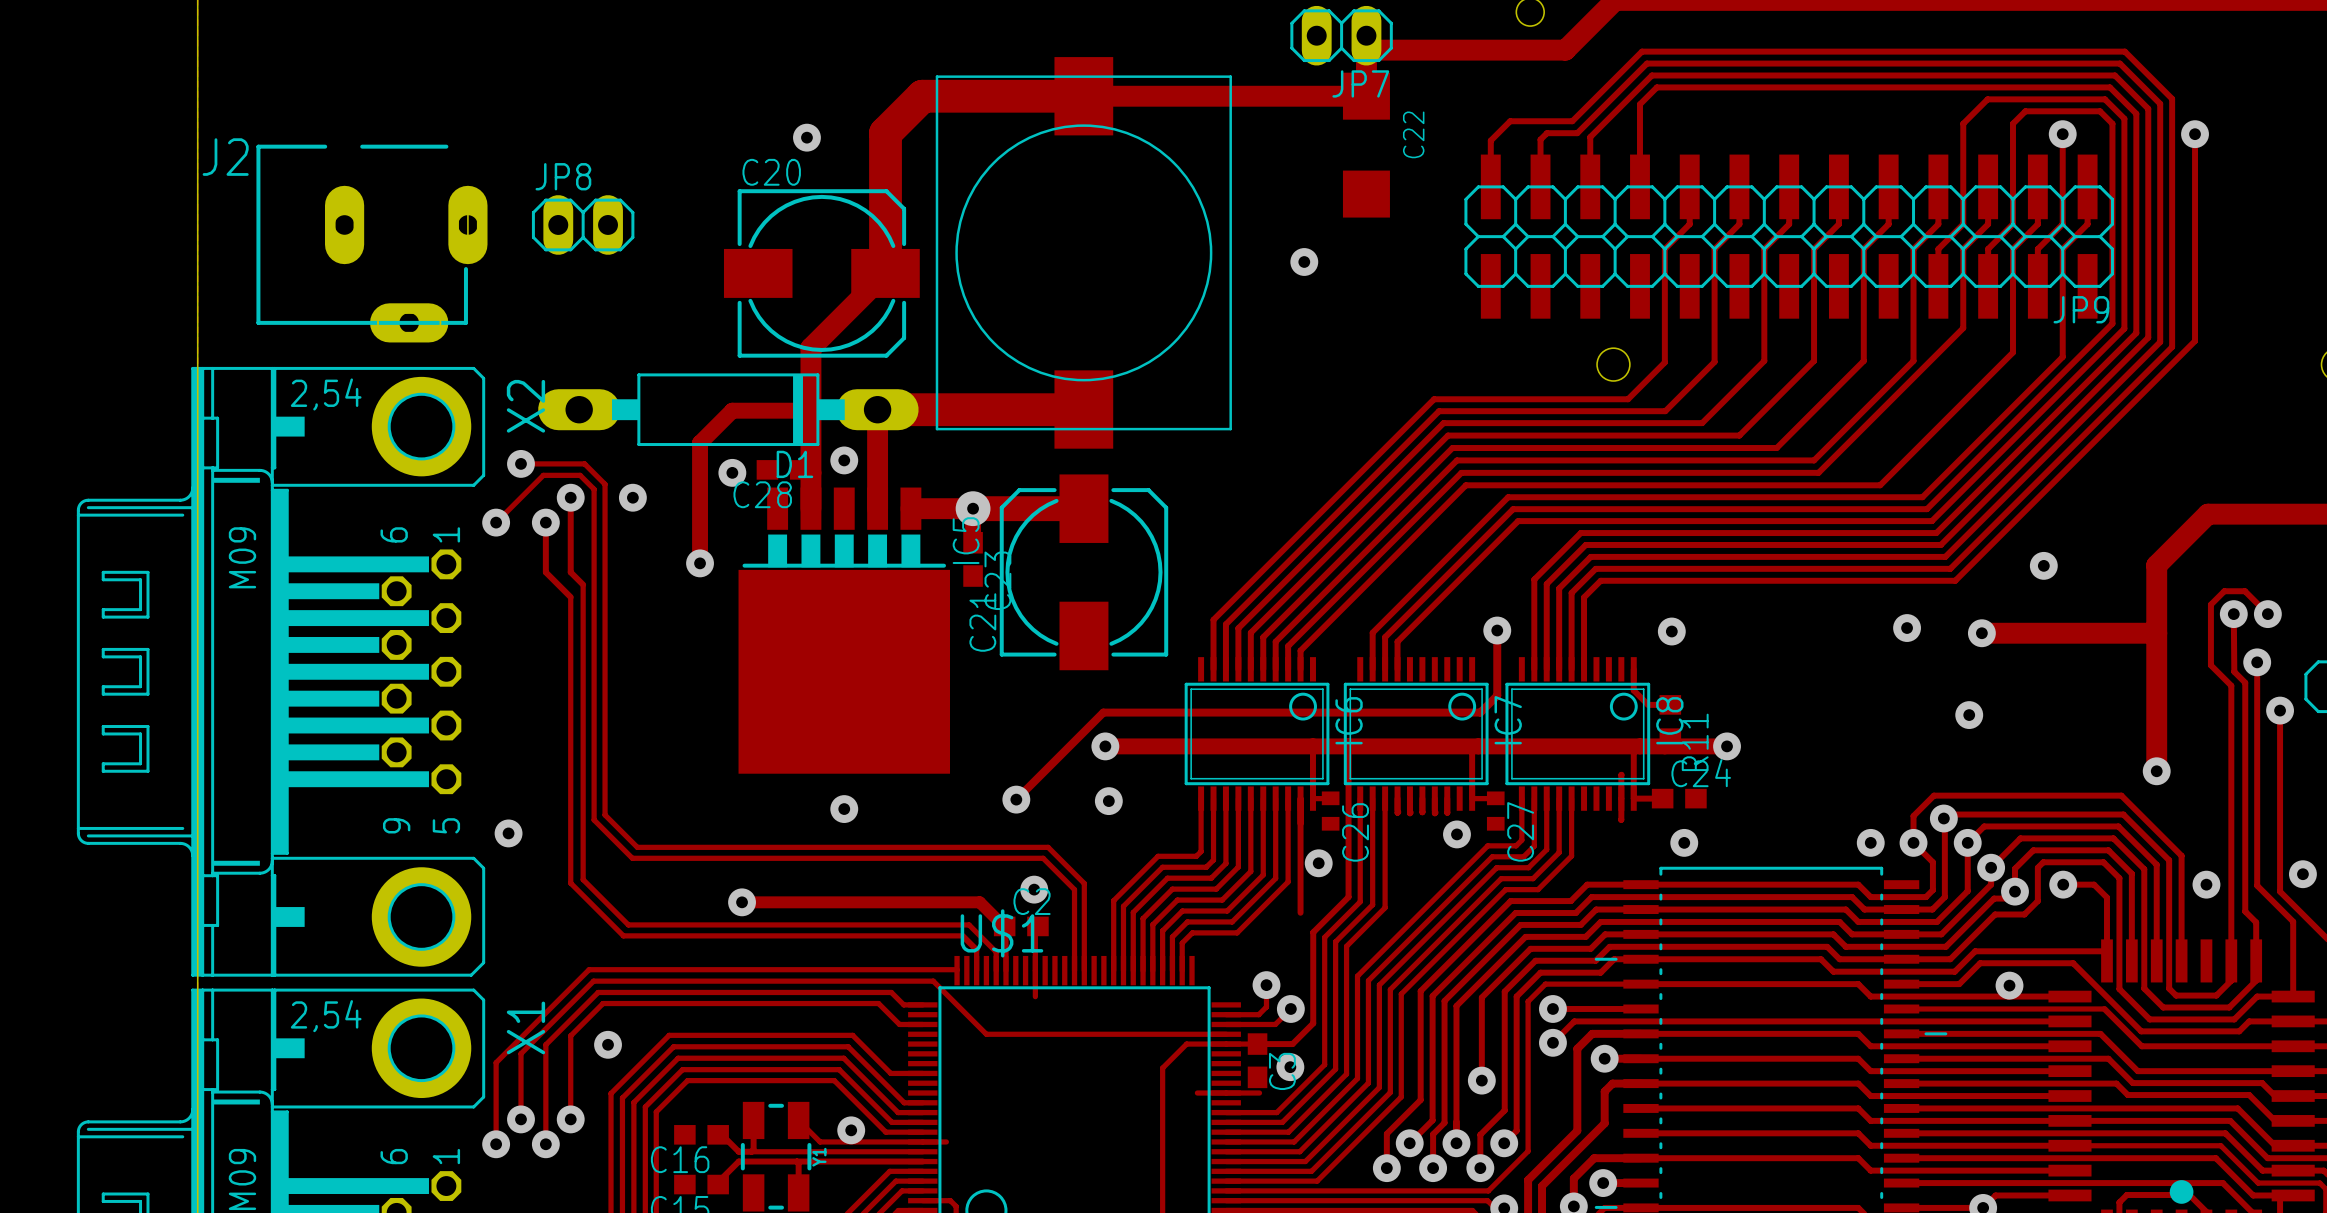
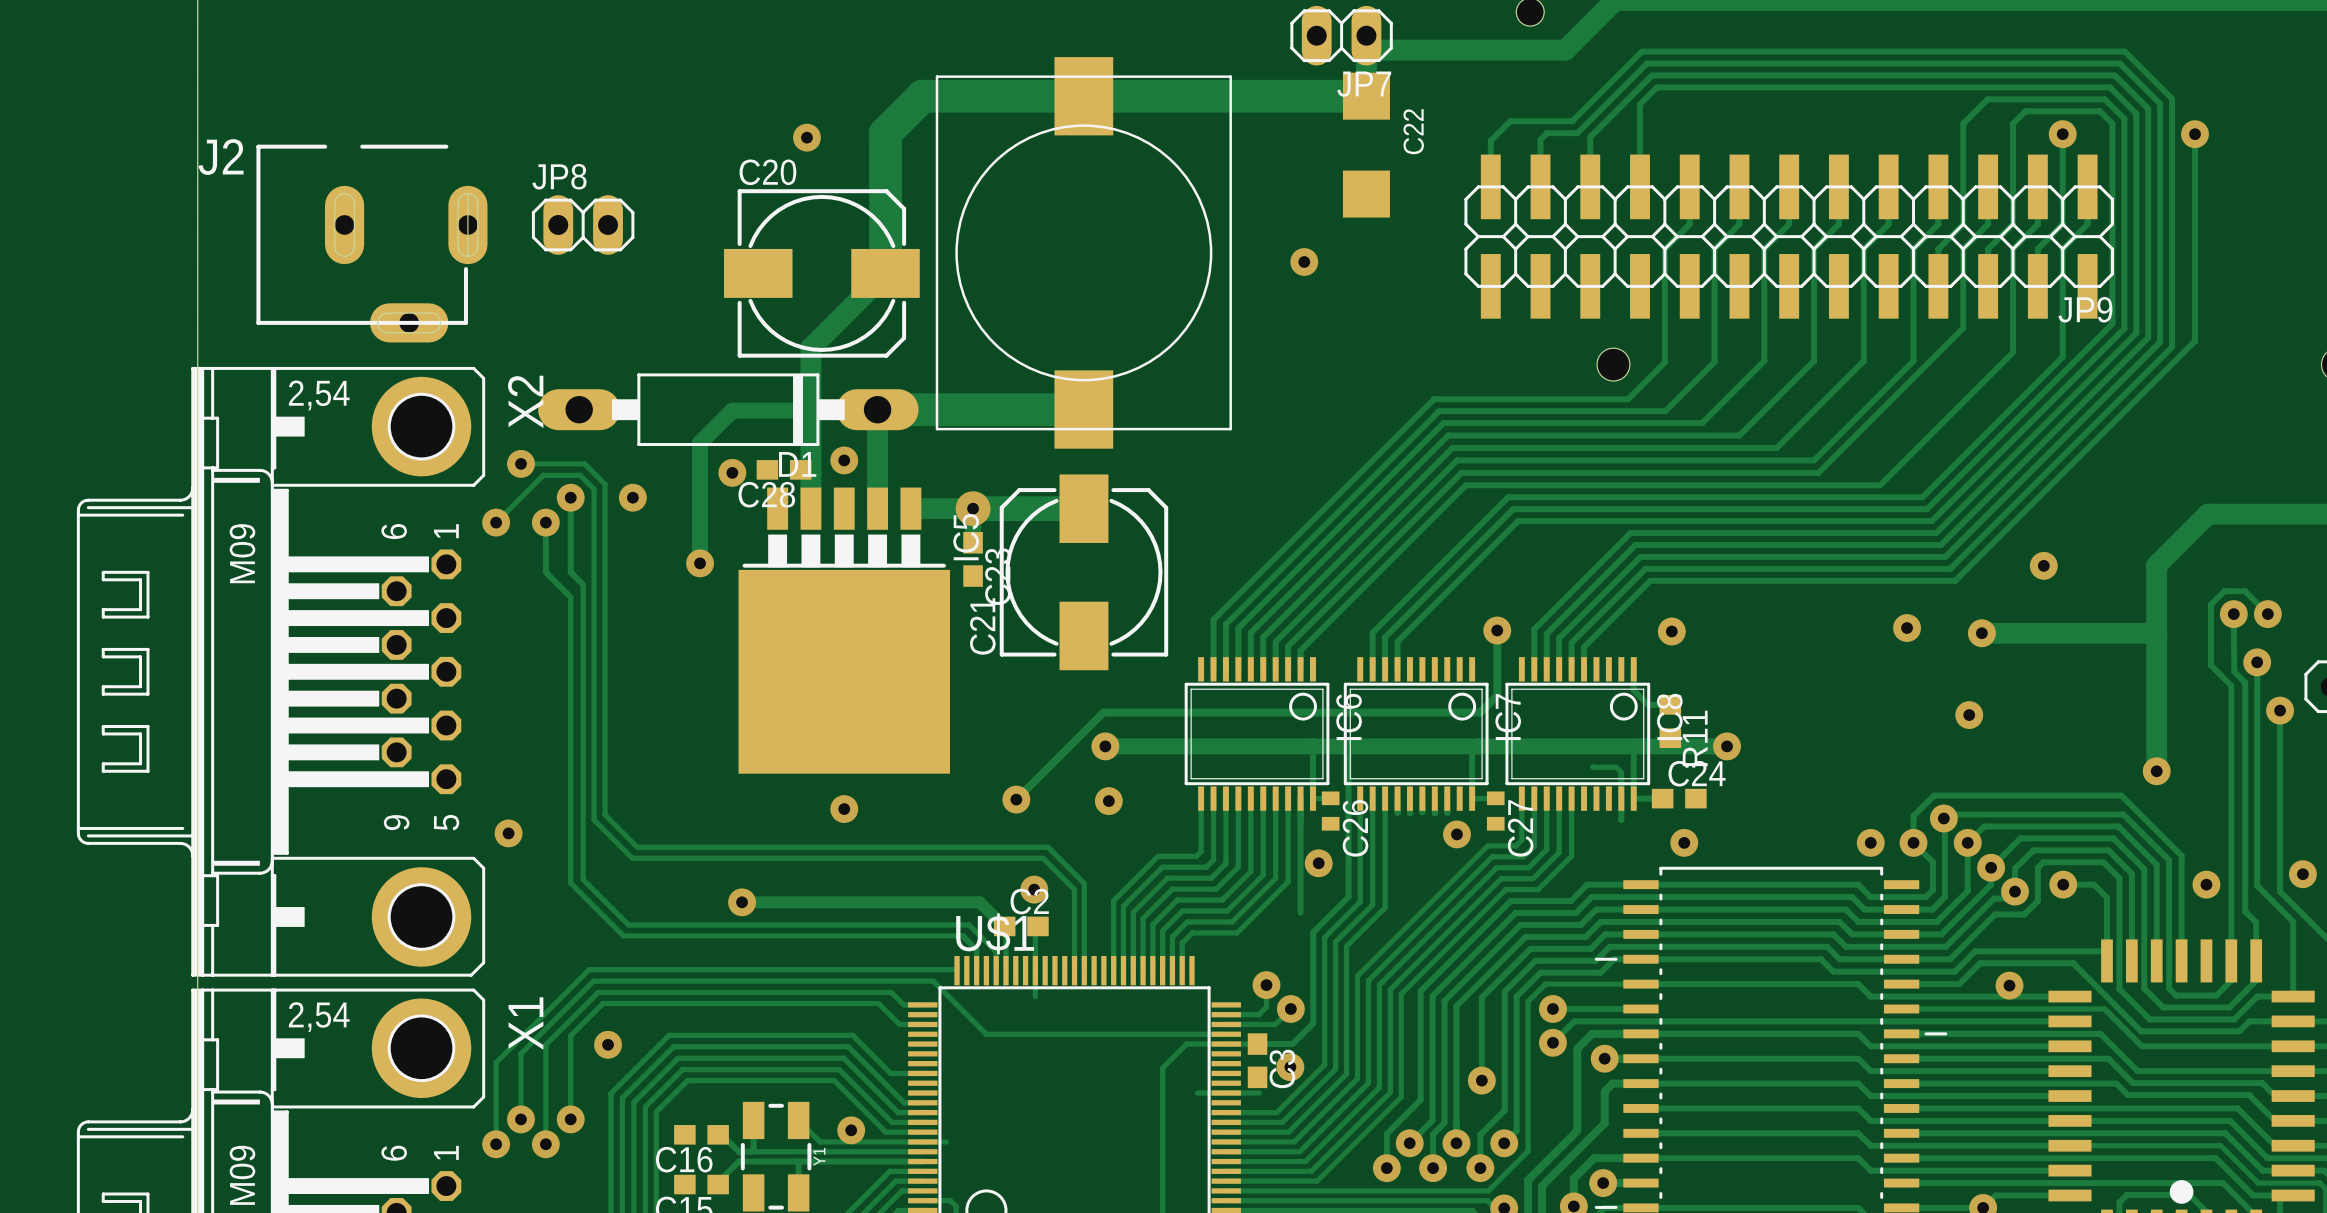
track width: thin (1083, 96) (1366, 96) -> thick (1083, 96) (1366, 96)
track: (1630, 533) (1580, 533) (1534, 579) (1534, 629) -> (1630, 533) (1534, 629)
track: (1635, 544) (1585, 544) (1546, 584) (1546, 633) -> (1635, 544) (1546, 633)
track: (1640, 556) (1590, 556) (1559, 588) (1559, 638) -> (1640, 556) (1559, 638)
track: (1645, 568) (1595, 568) (1571, 592) (1571, 642) -> (1645, 568) (1571, 642)
track: (1650, 580) (1600, 580) (1584, 597) (1584, 647) -> (1650, 580) (1584, 647)
track: none -> (1592, 766) (1616, 767) (1621, 775)

